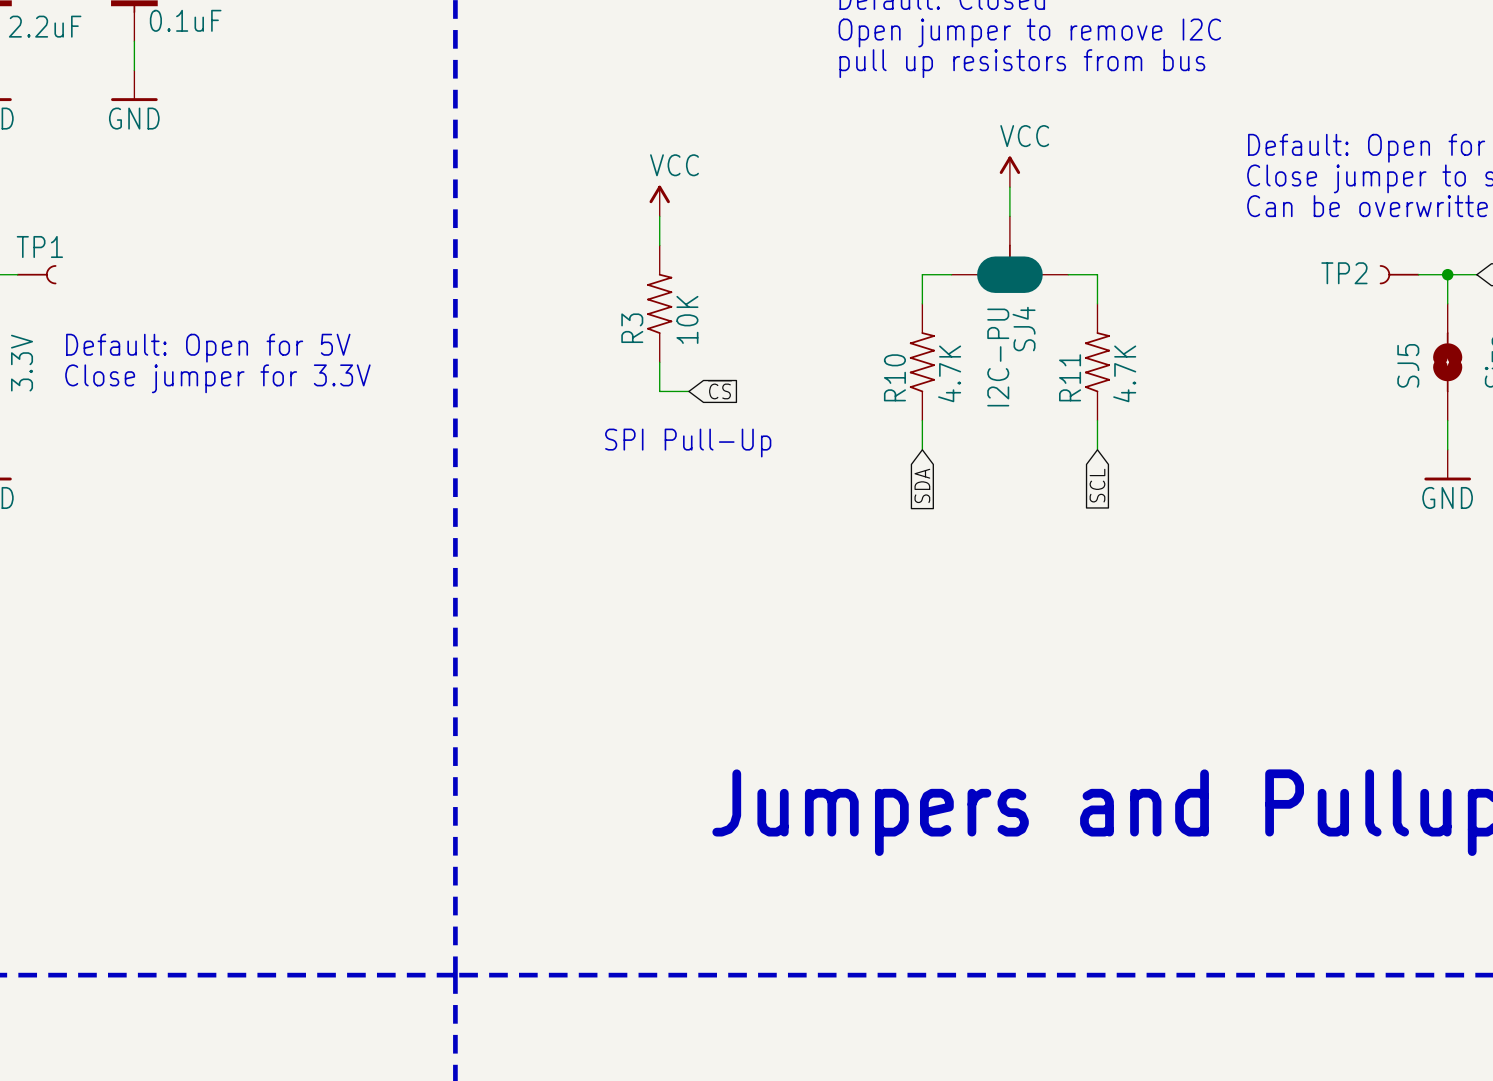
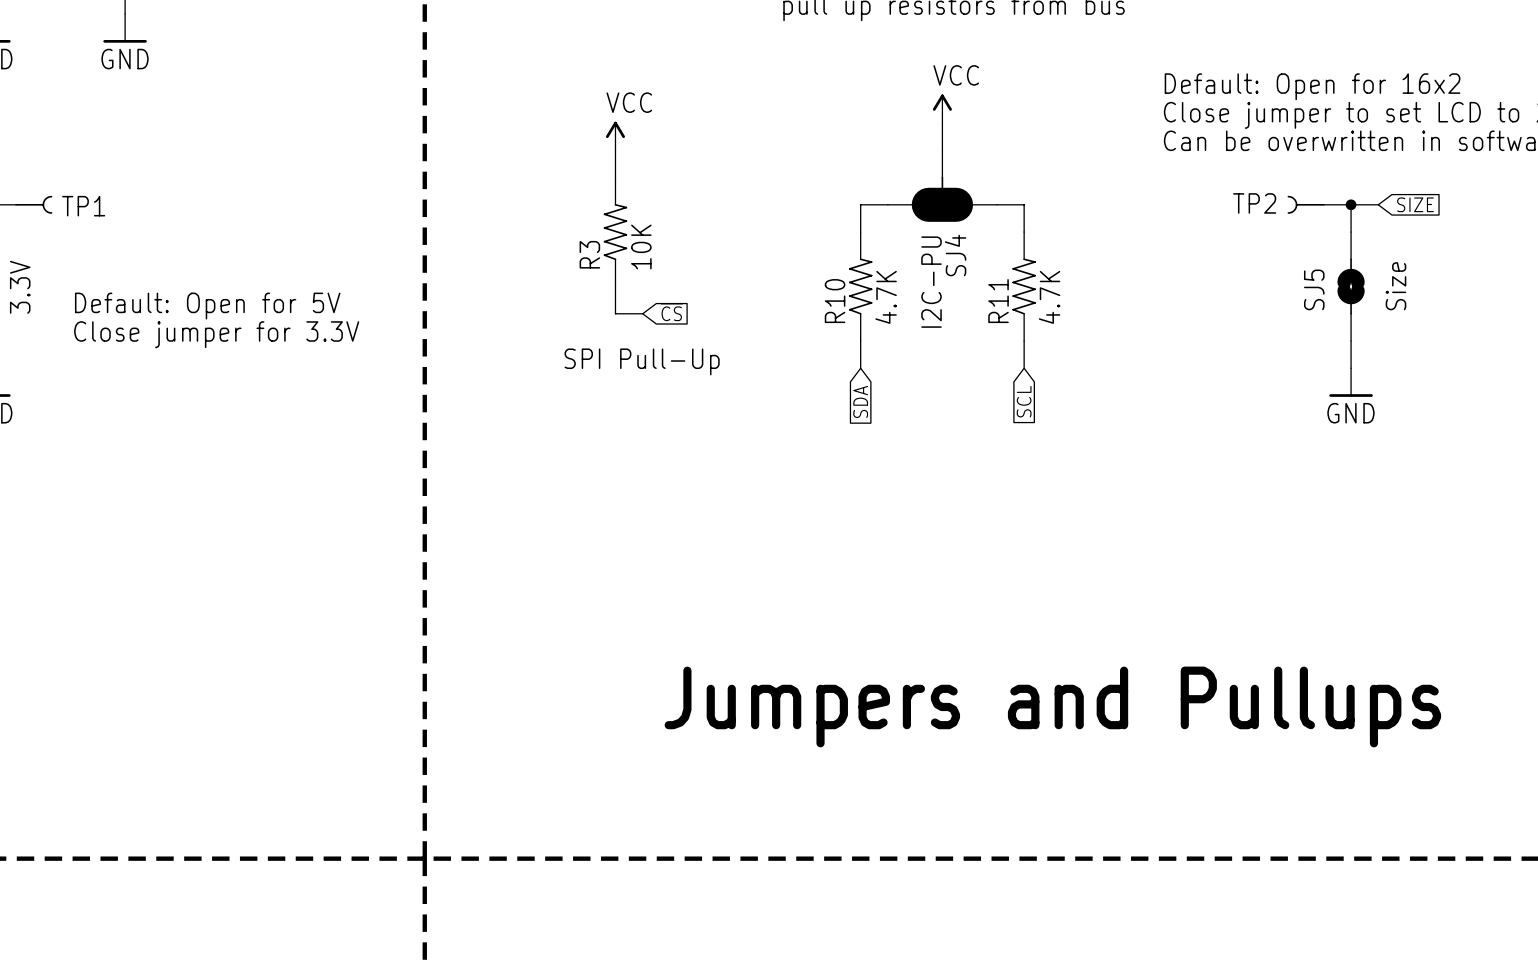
TP1 name position: TP1 (39, 246) -> TP1 (83, 206)
text position: Default: Open for 5V (208, 348) -> Default: Open for 5V (207, 306)
text position: Close jumper for 3.3V (217, 378) -> Close jumper for 3.3V (216, 334)

